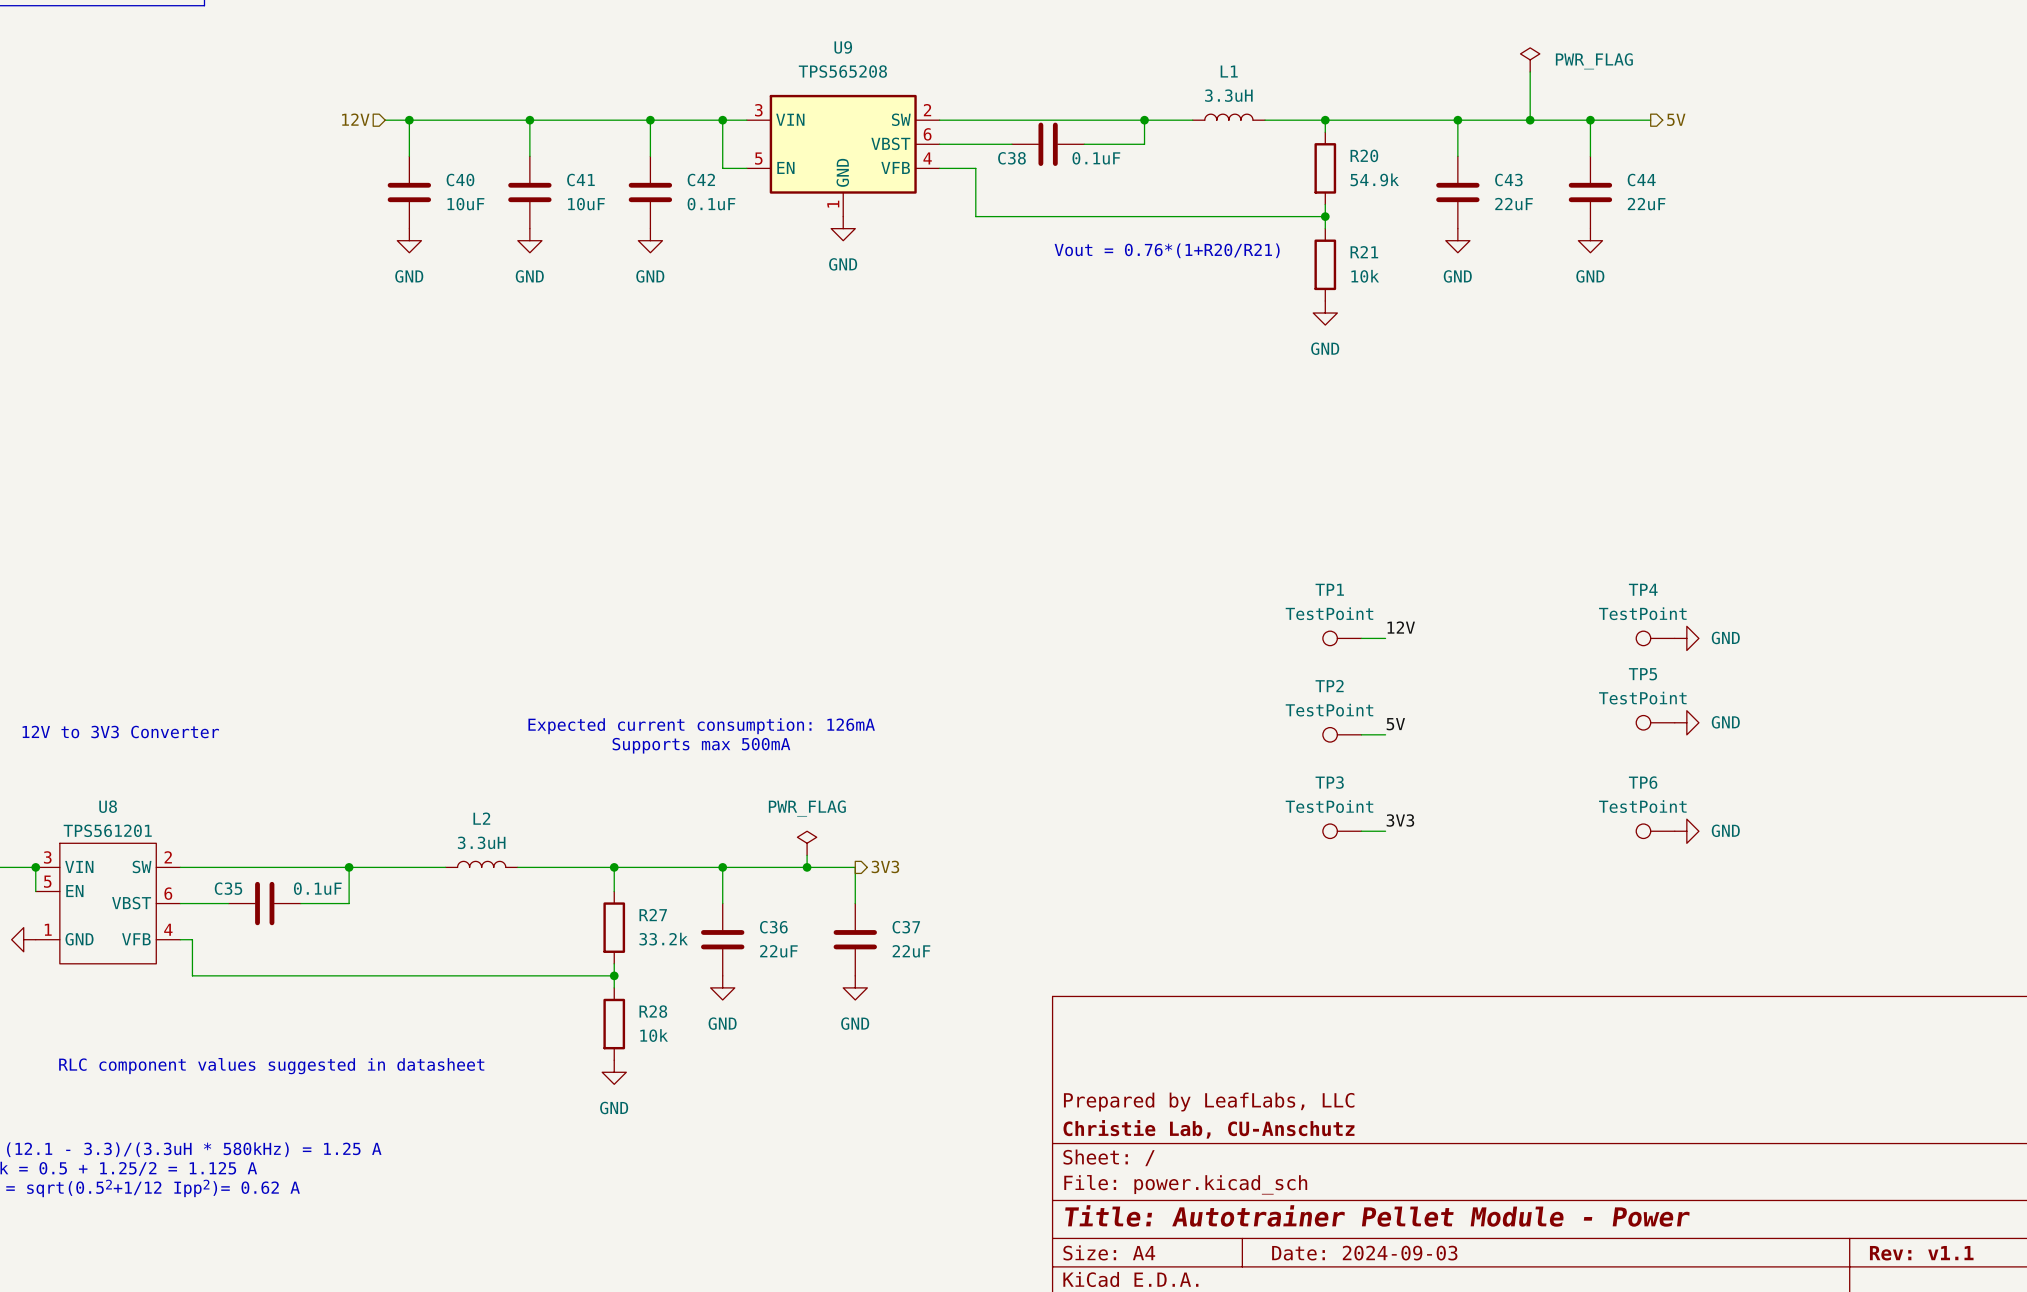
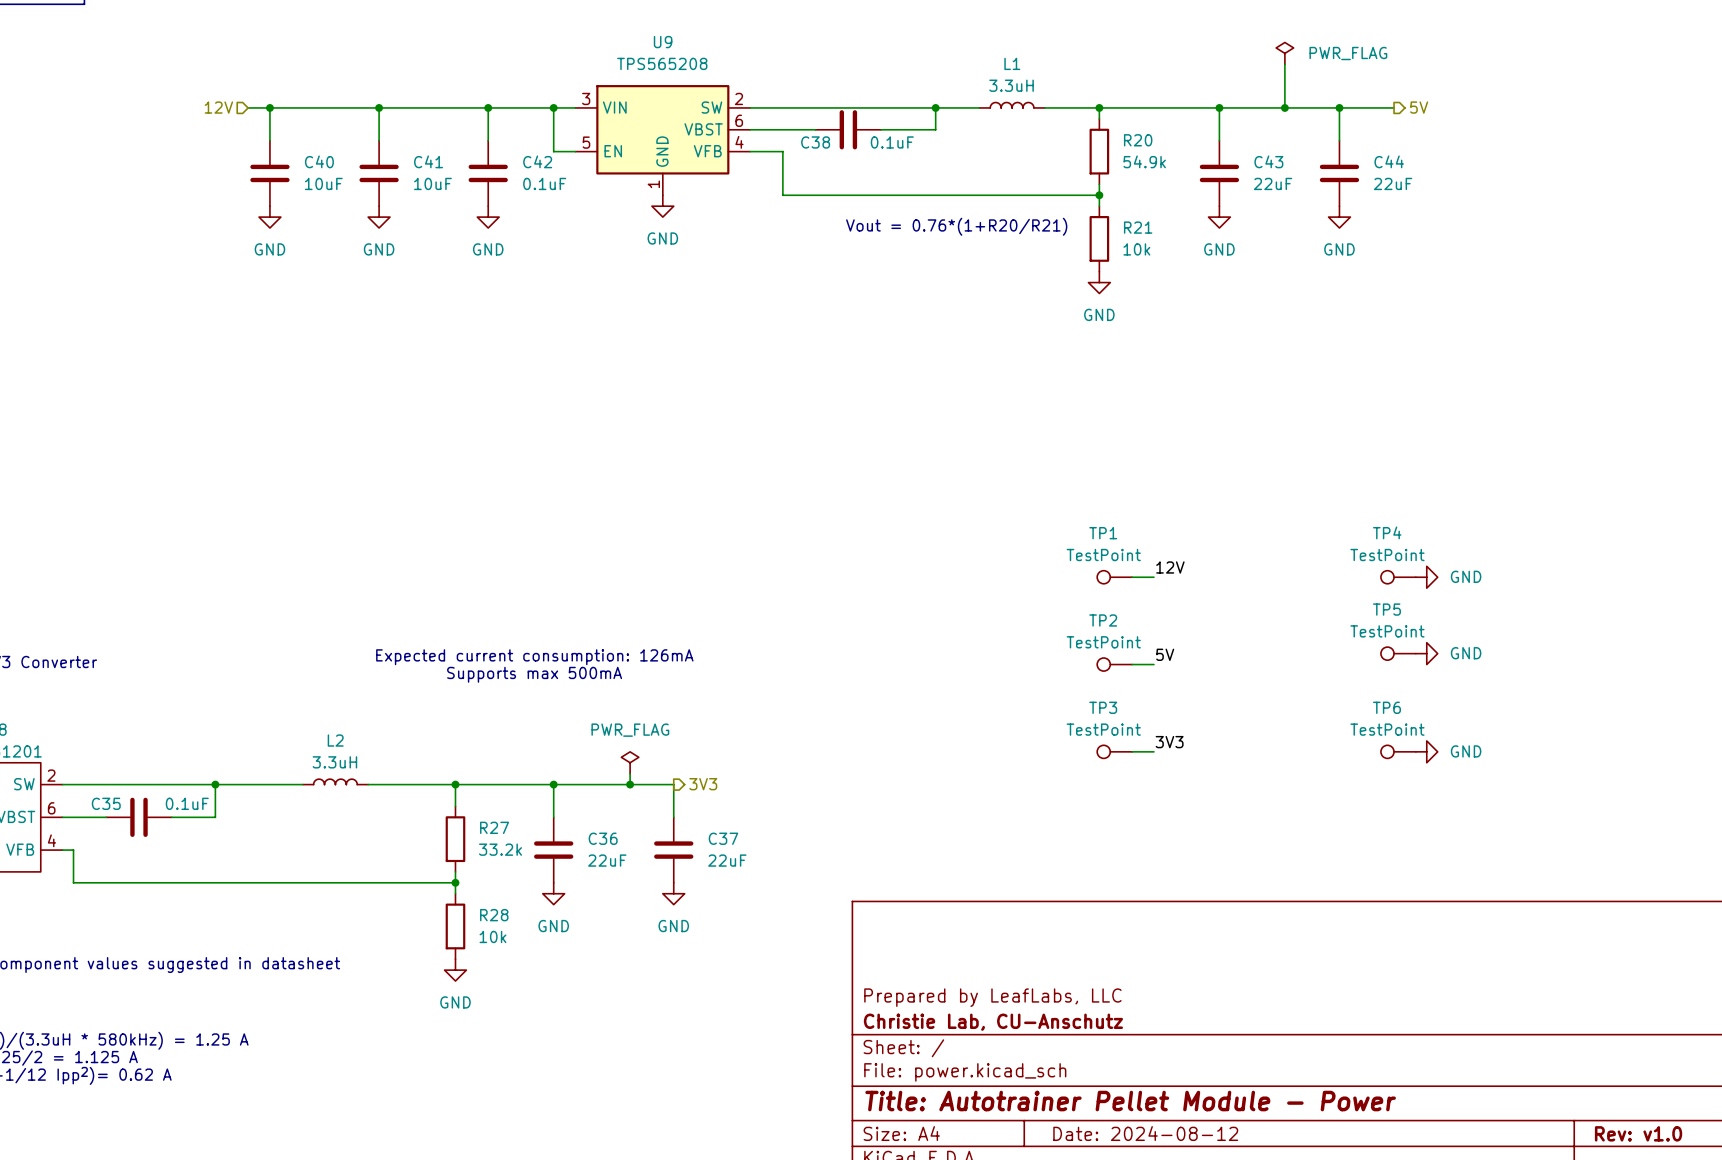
title block: Date: 2024-09-03 (1364, 1253) -> Date: 2024-08-12 (1145, 1133)
title block: Rev: v1.1 (1921, 1253) -> Rev: v1.0 (1638, 1133)

